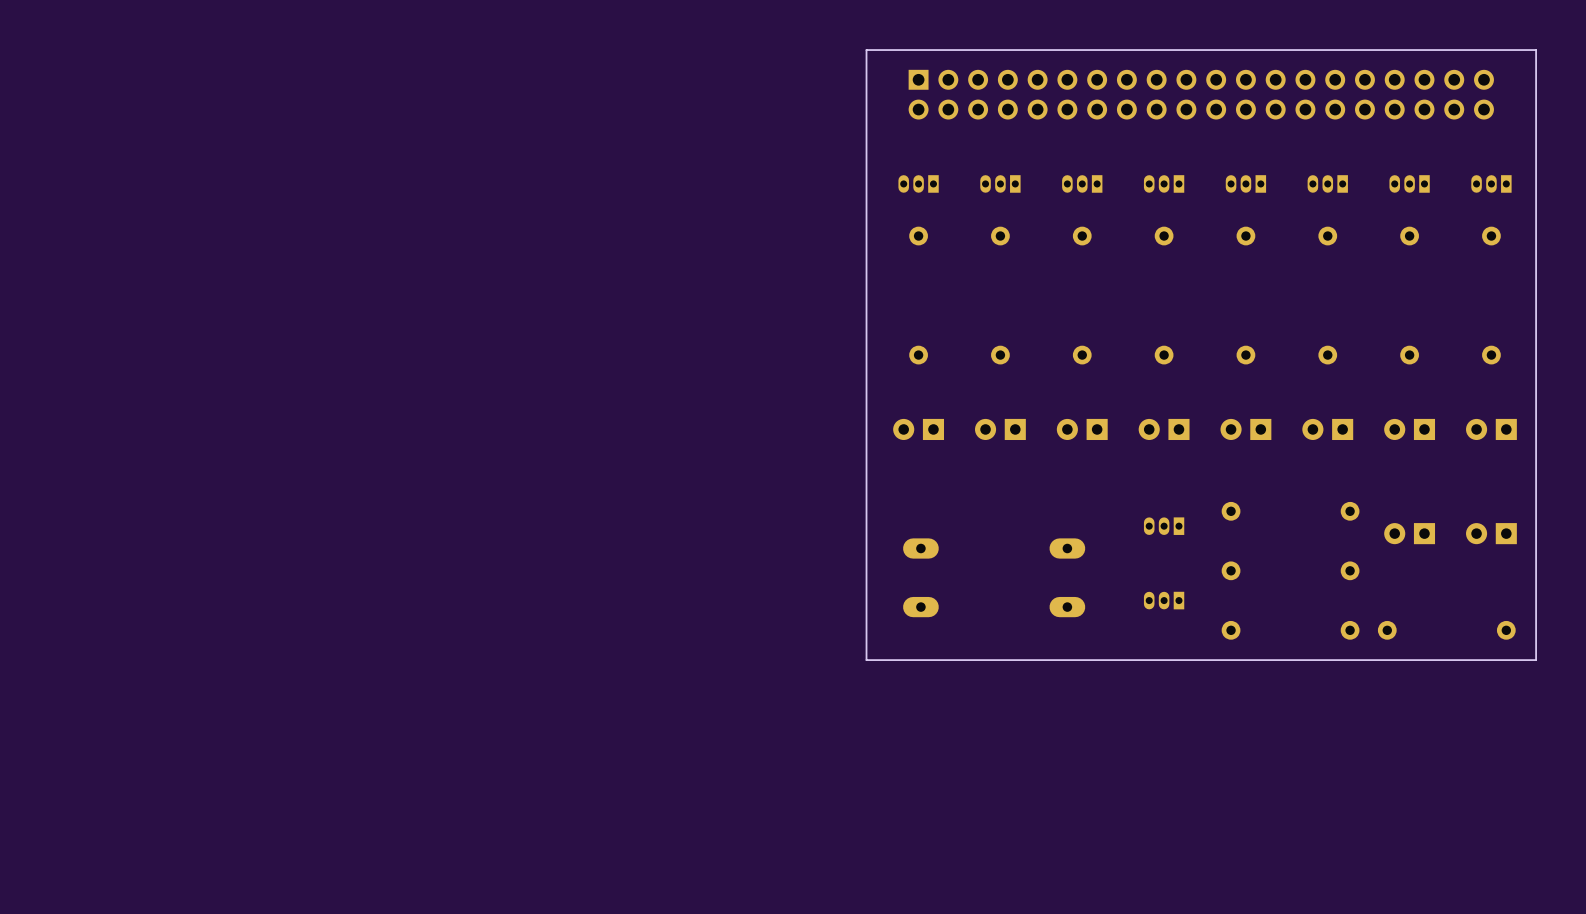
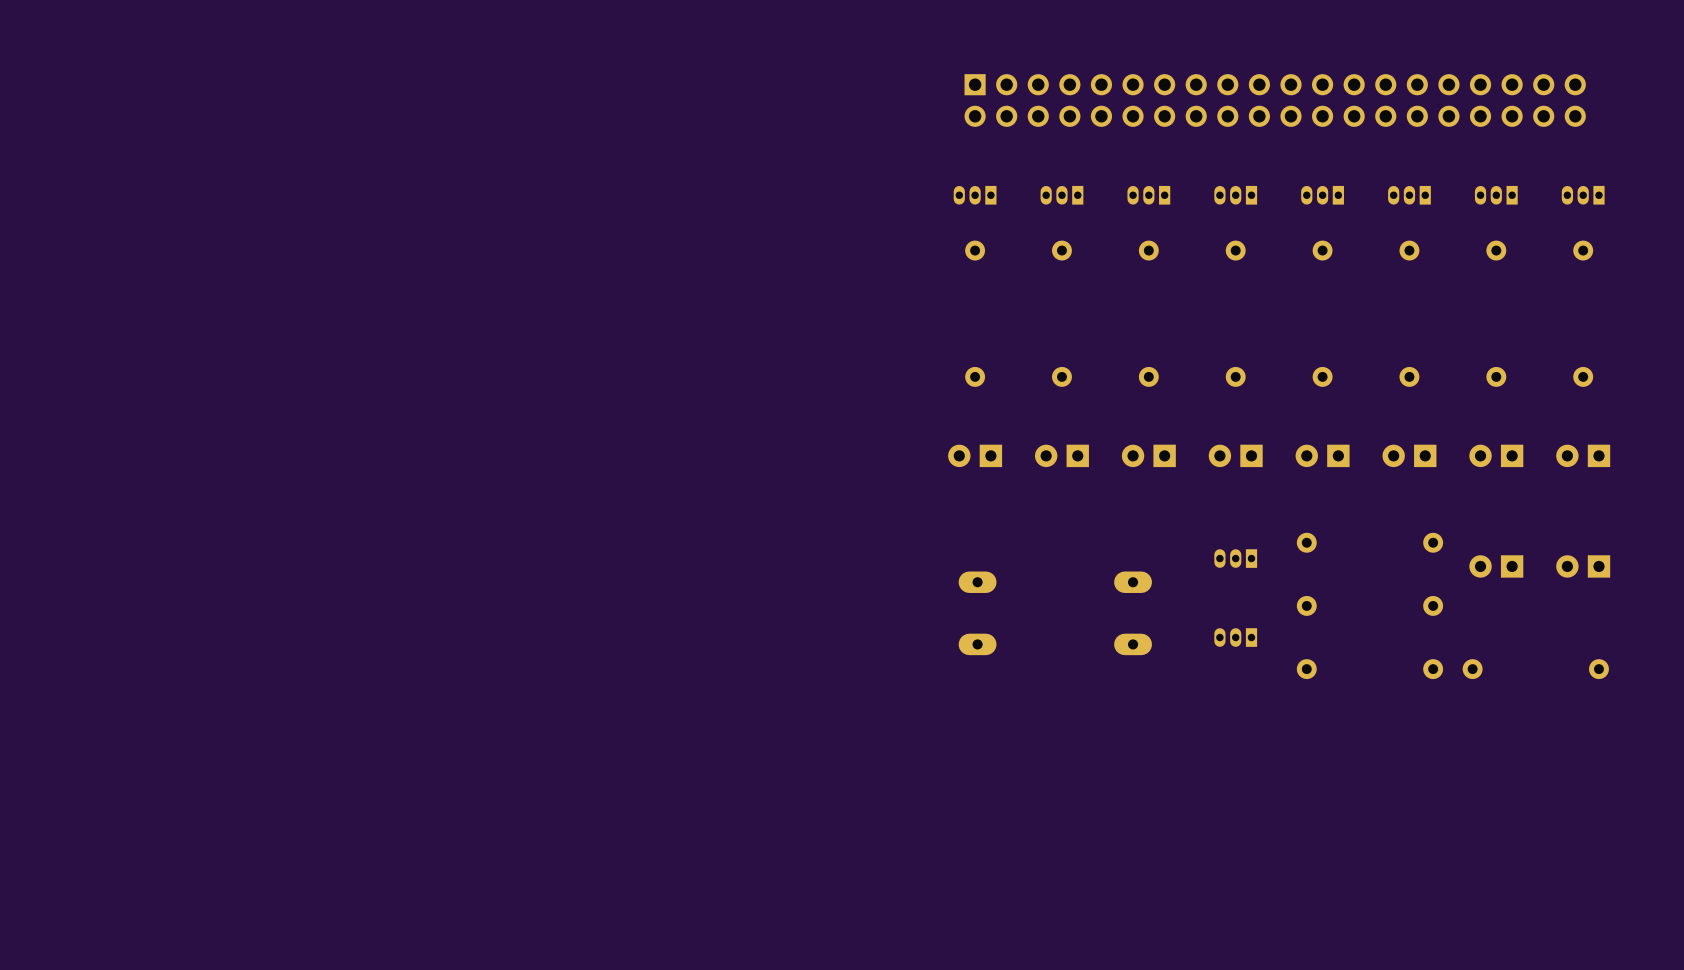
board edge: (1536, 50) (1536, 660) (866, 660) (866, 50) (1536, 50) -> none

